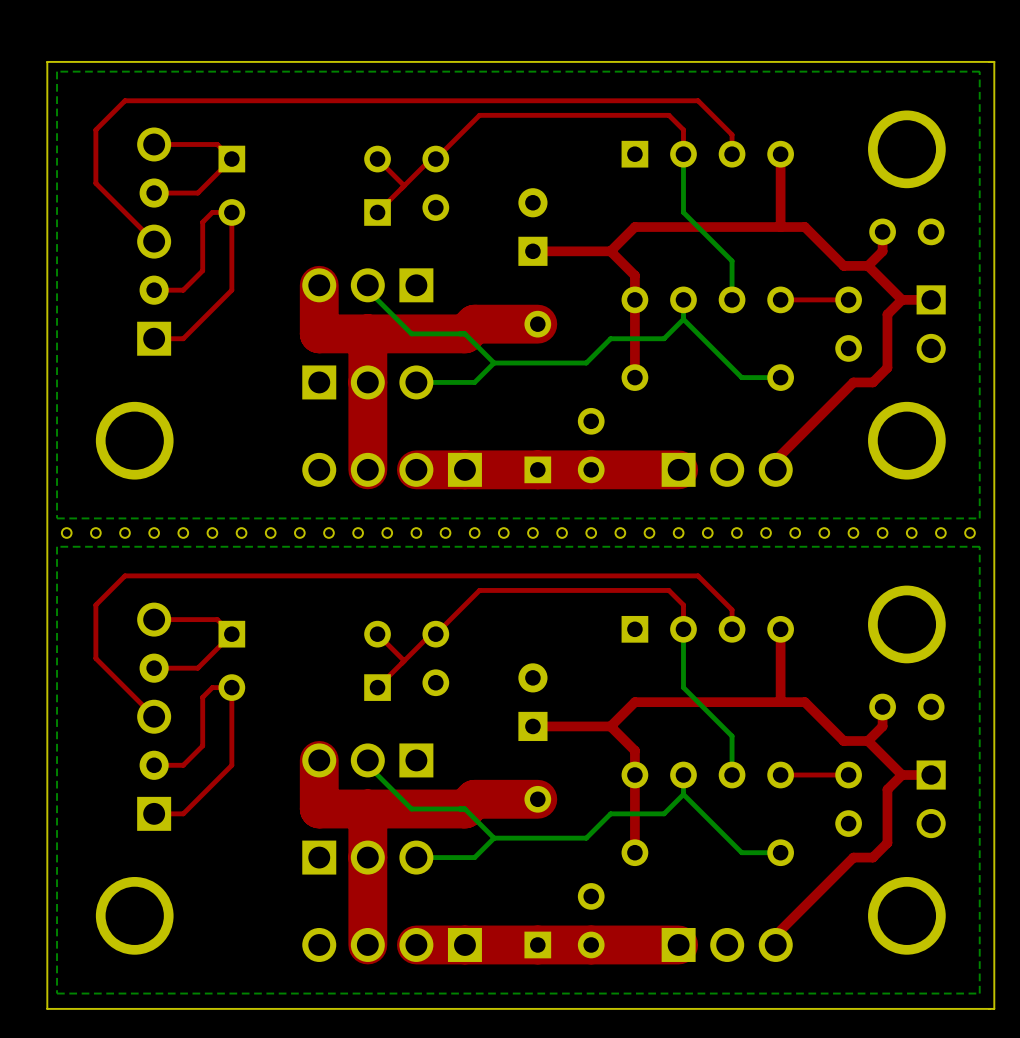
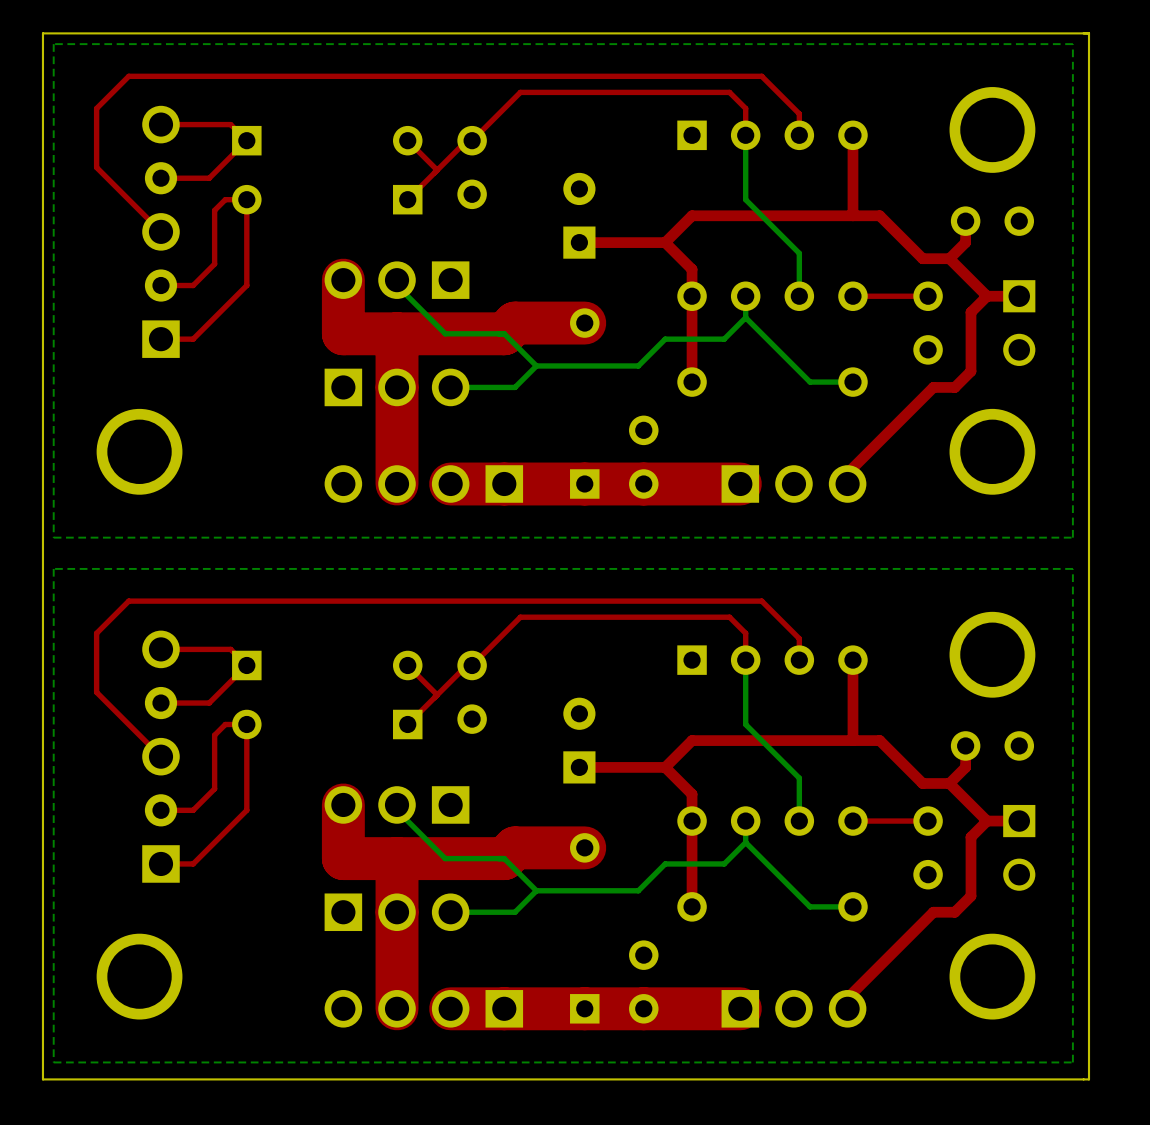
part: (66, 532) -> none
part: (95, 532) -> none
part: (125, 532) -> none
part: (154, 532) -> none
part: (183, 532) -> none
part: (212, 532) -> none
part: (241, 532) -> none
part: (270, 532) -> none
part: (299, 532) -> none
part: (328, 532) -> none
part: (358, 532) -> none
part: (387, 532) -> none
part: (416, 532) -> none
part: (445, 532) -> none
part: (474, 532) -> none
part: (503, 532) -> none
part: (532, 532) -> none
part: (562, 532) -> none
part: (591, 532) -> none
part: (620, 532) -> none
part: (649, 532) -> none
part: (678, 532) -> none
part: (707, 532) -> none
part: (736, 532) -> none
part: (766, 532) -> none
part: (795, 532) -> none
part: (824, 532) -> none
part: (853, 532) -> none
part: (882, 532) -> none
part: (911, 532) -> none
part: (940, 532) -> none
part: (970, 532) -> none

